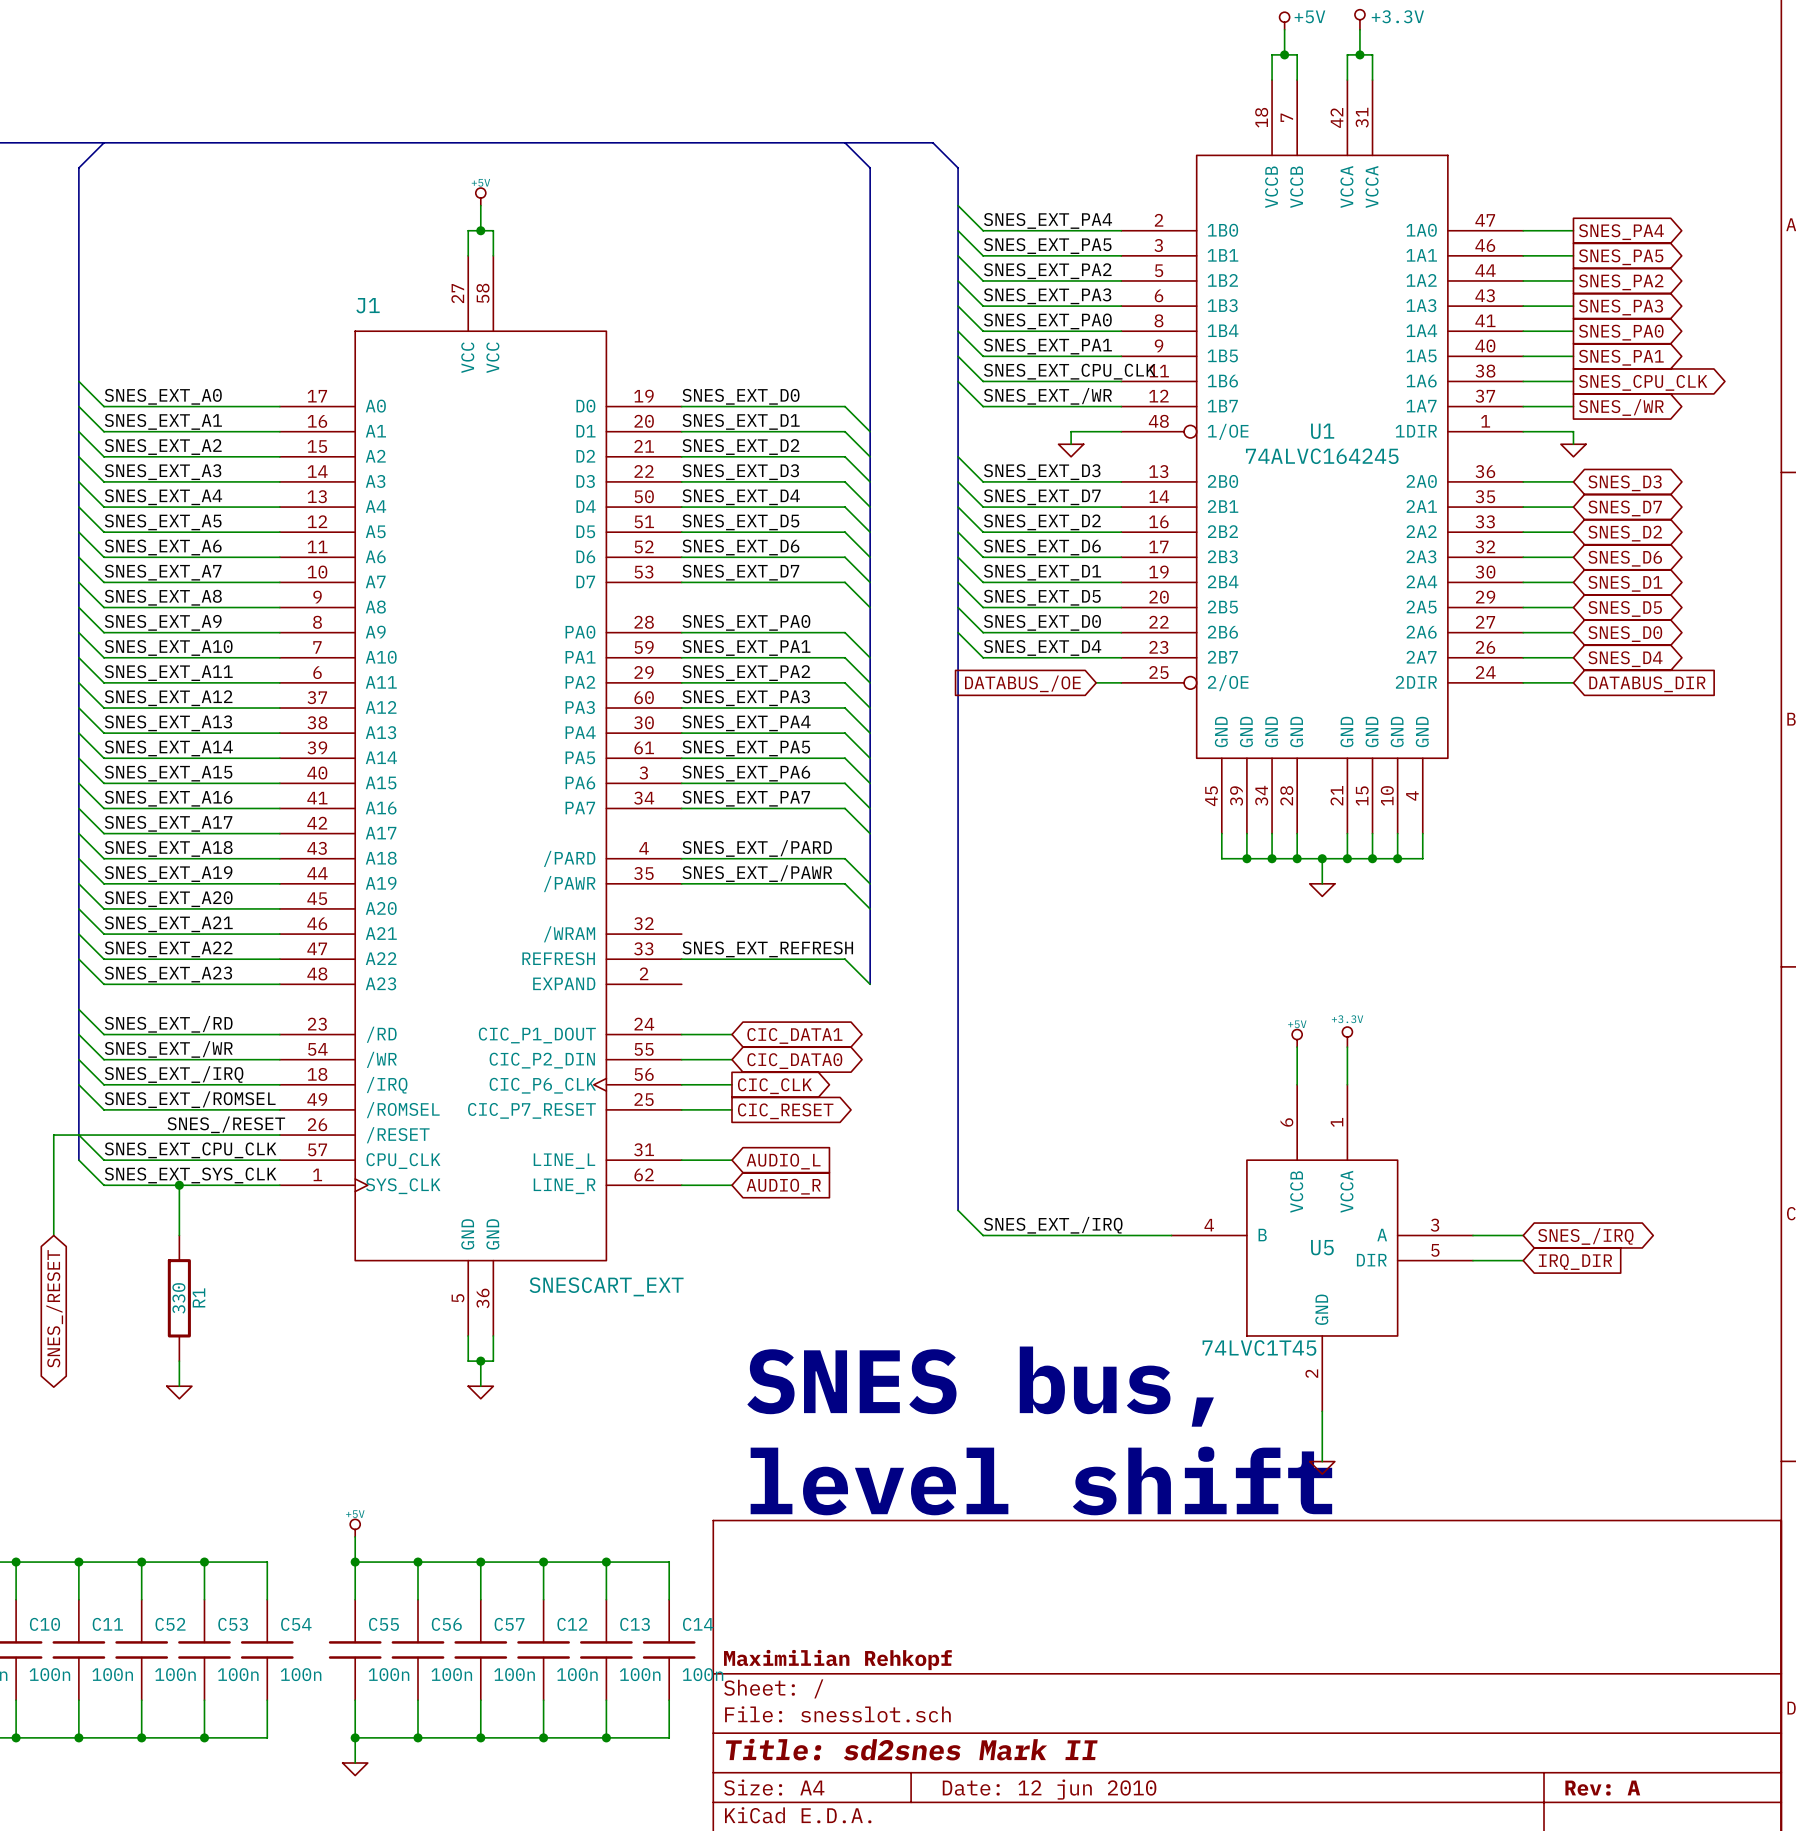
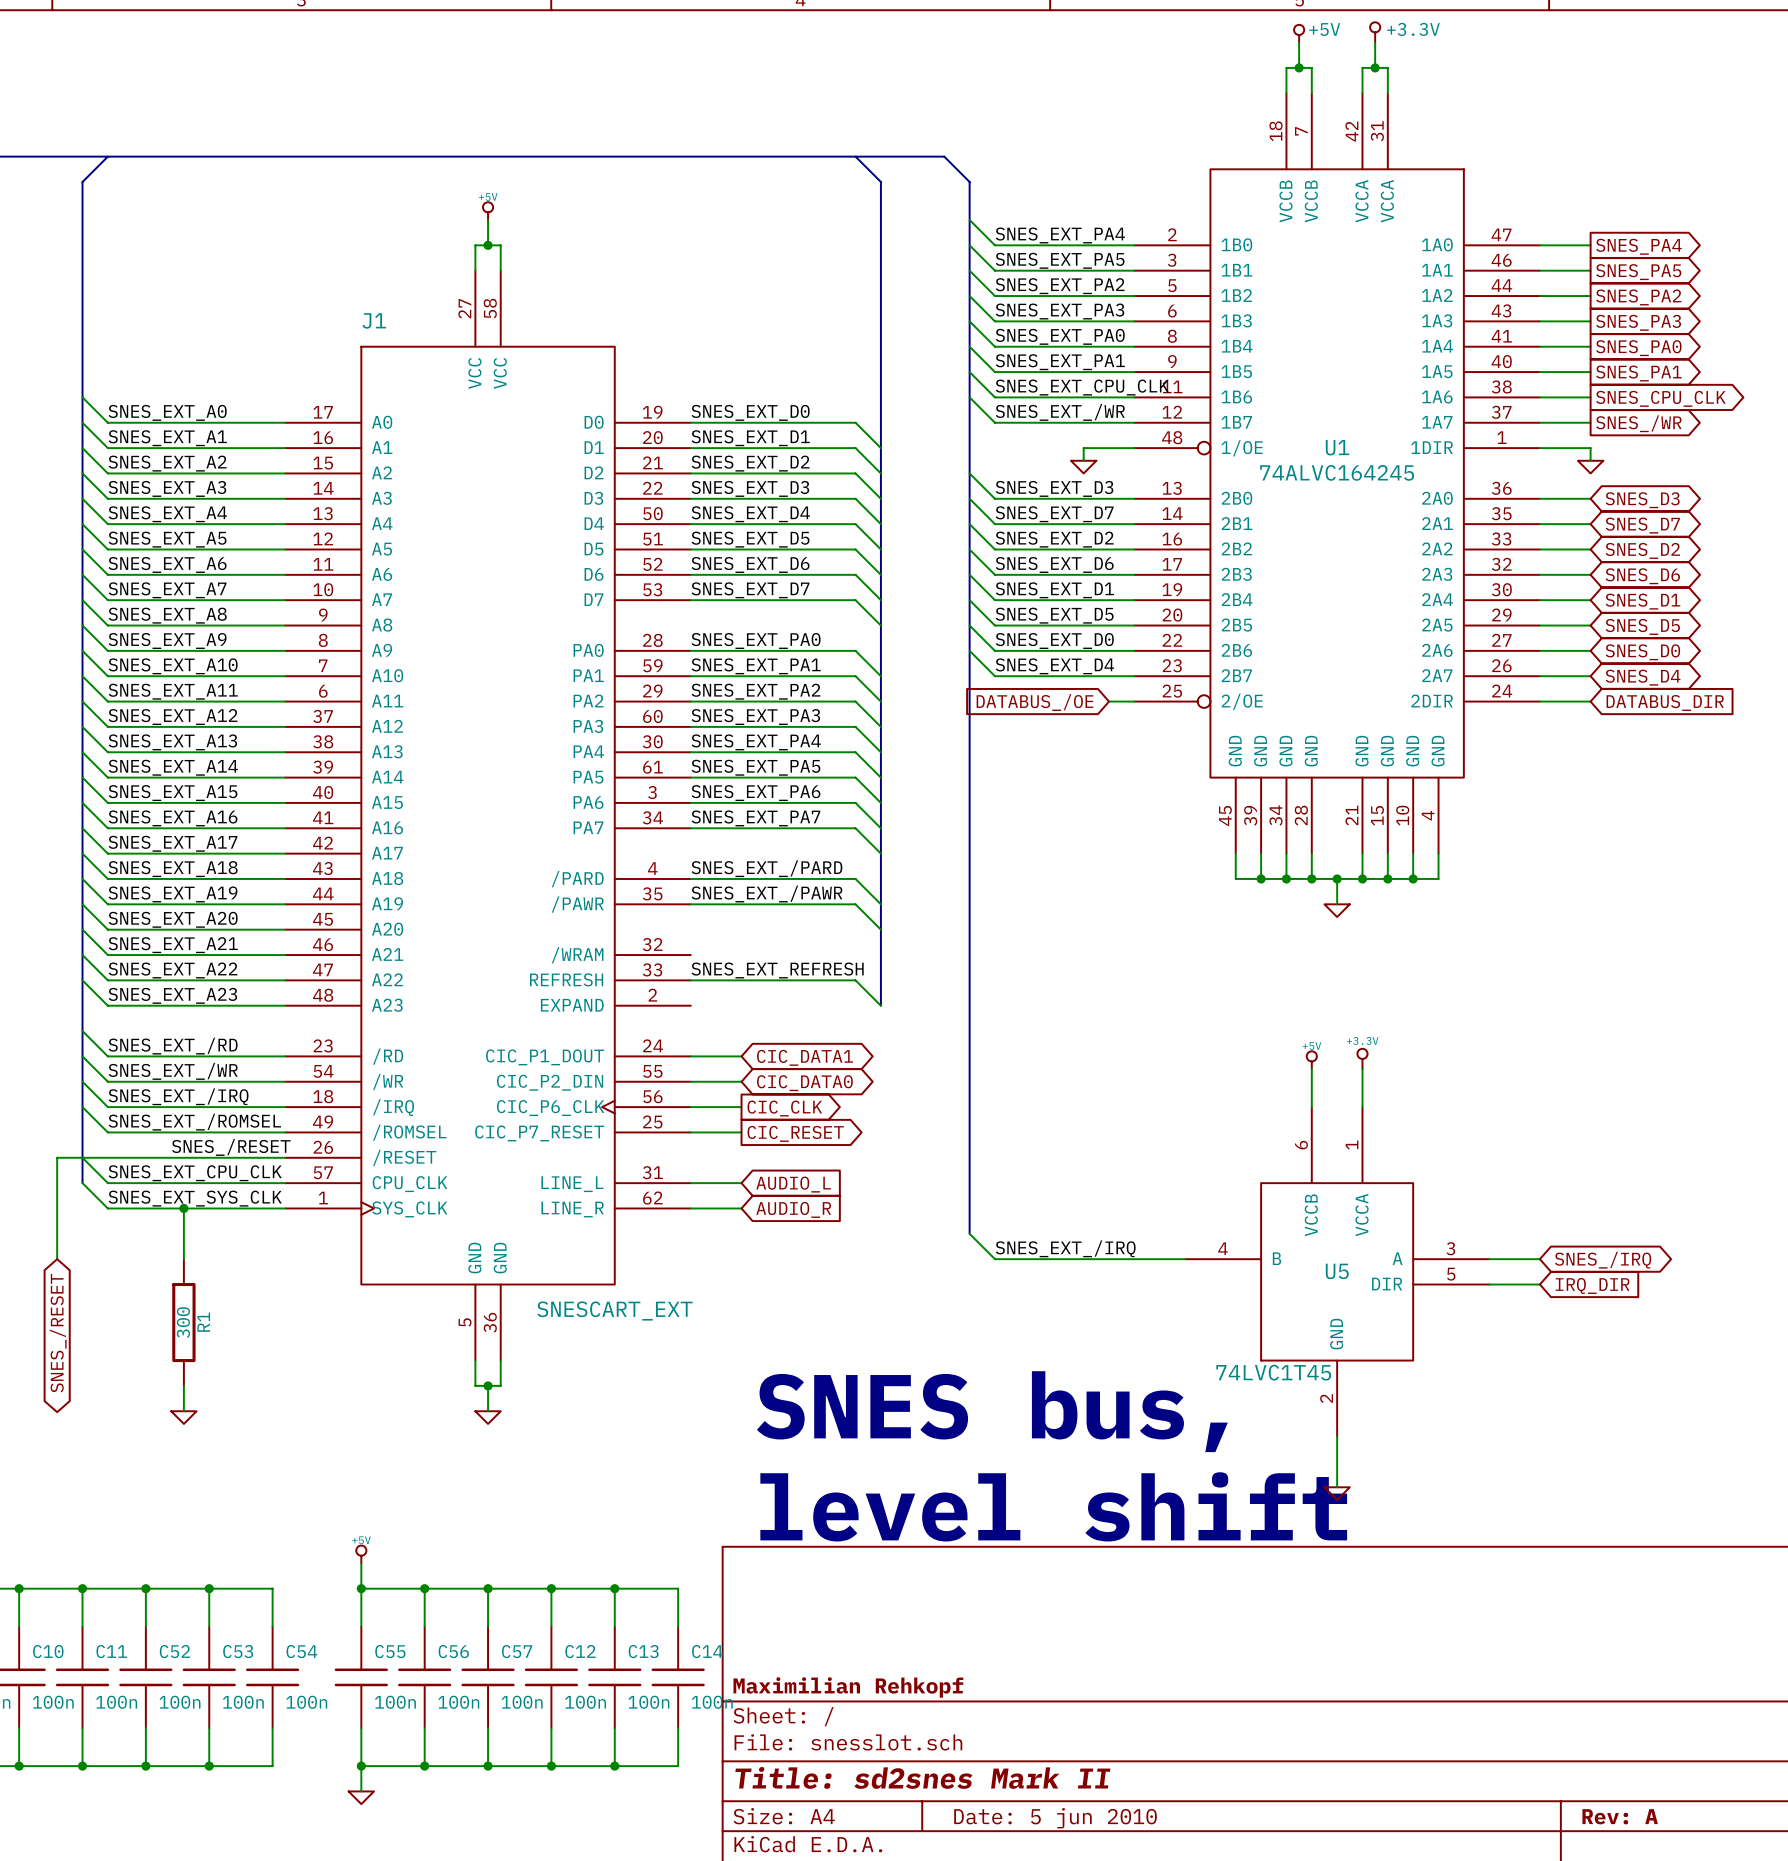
R1 value: 330 (178, 1298) -> 300 (183, 1322)
title block: Date: 12 jun 2010 (1049, 1789) -> Date: 5 jun 2010 (1055, 1818)

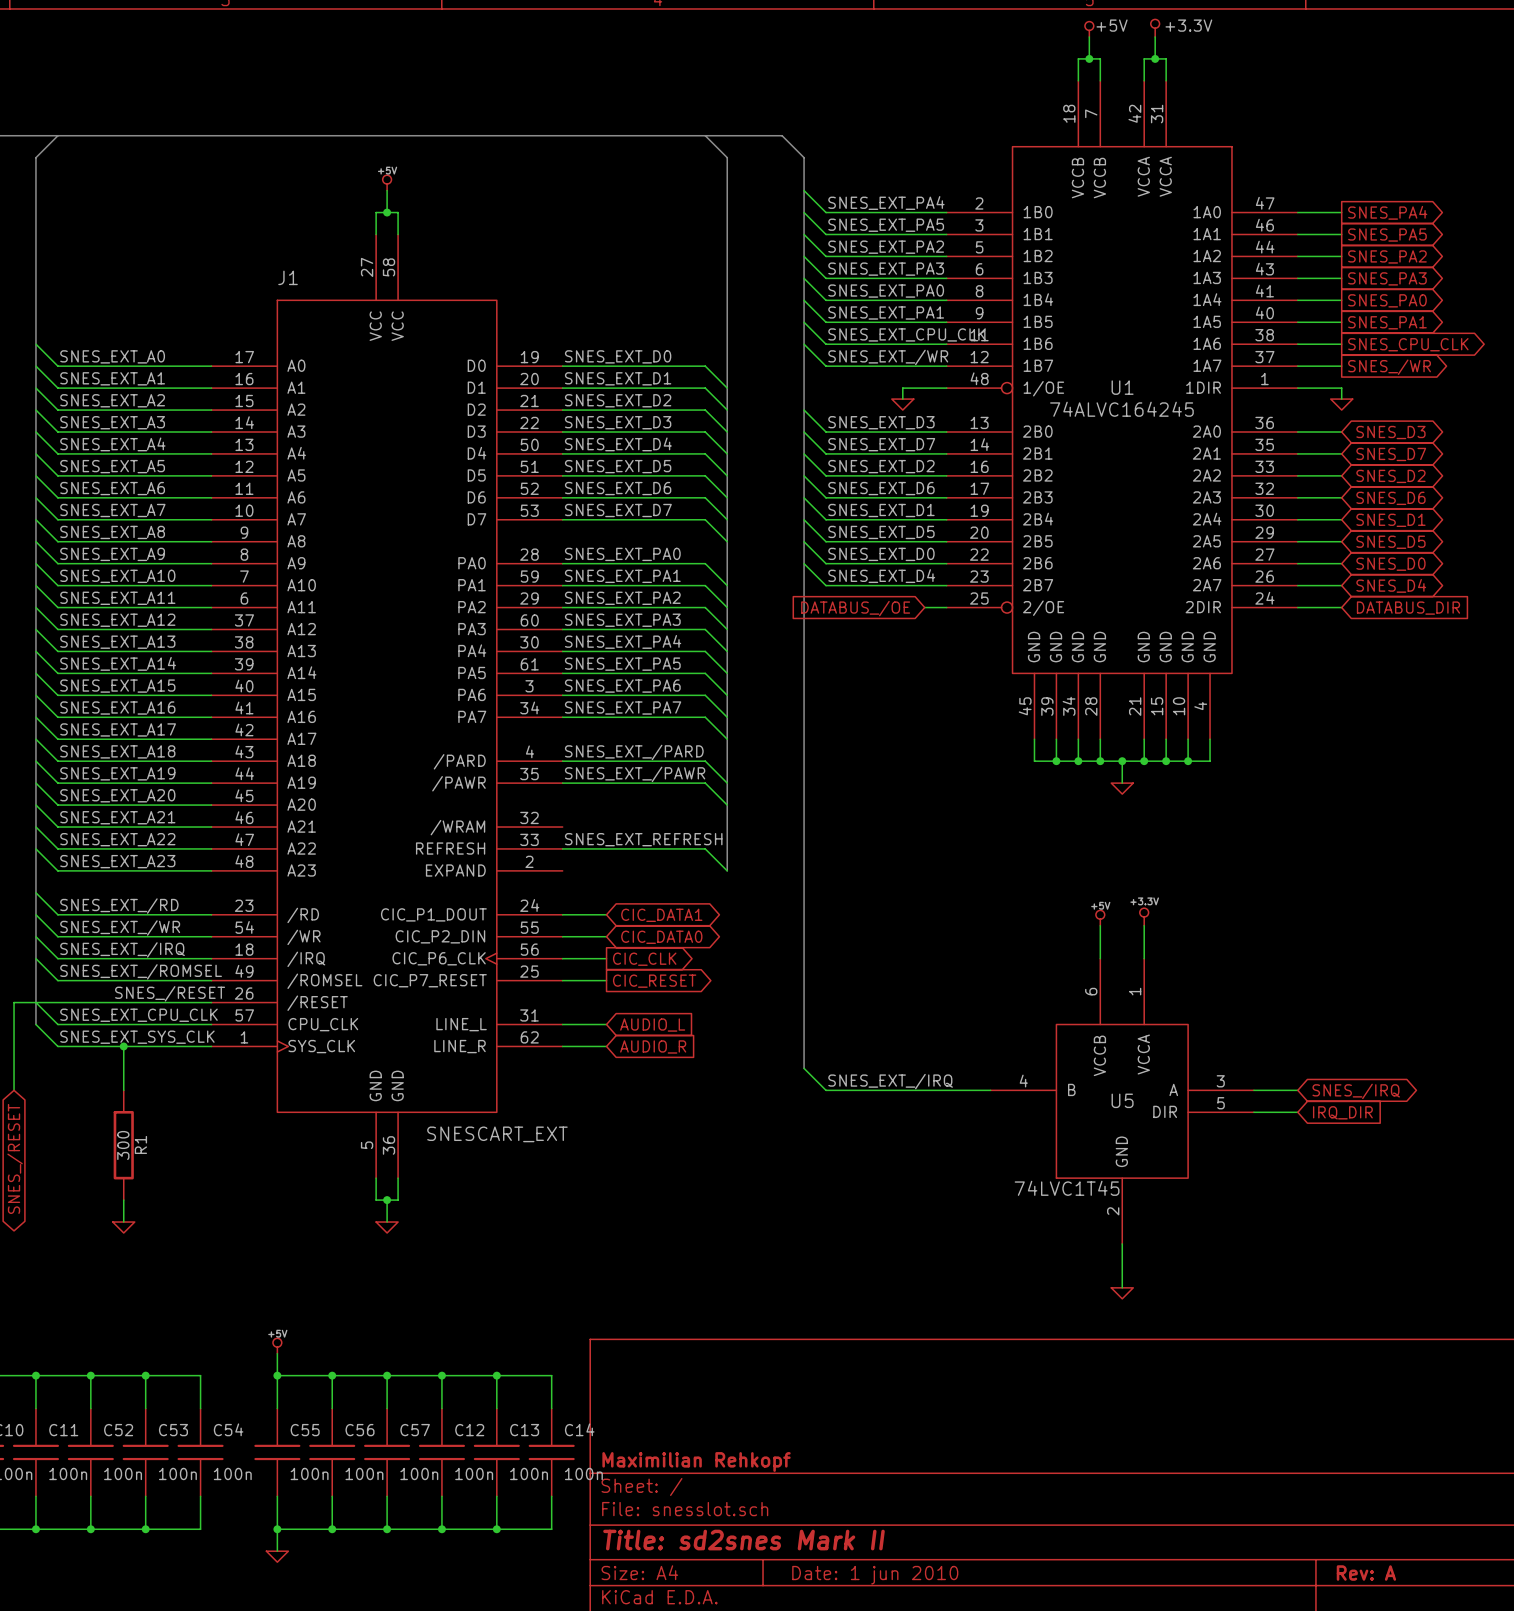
text: SNES bus, (992, 1411) -> none
text: level shift (1053, 1506) -> none
title block: Date: 5 jun 2010 (1055, 1818) -> Date: 1 jun 2010 (875, 1575)

